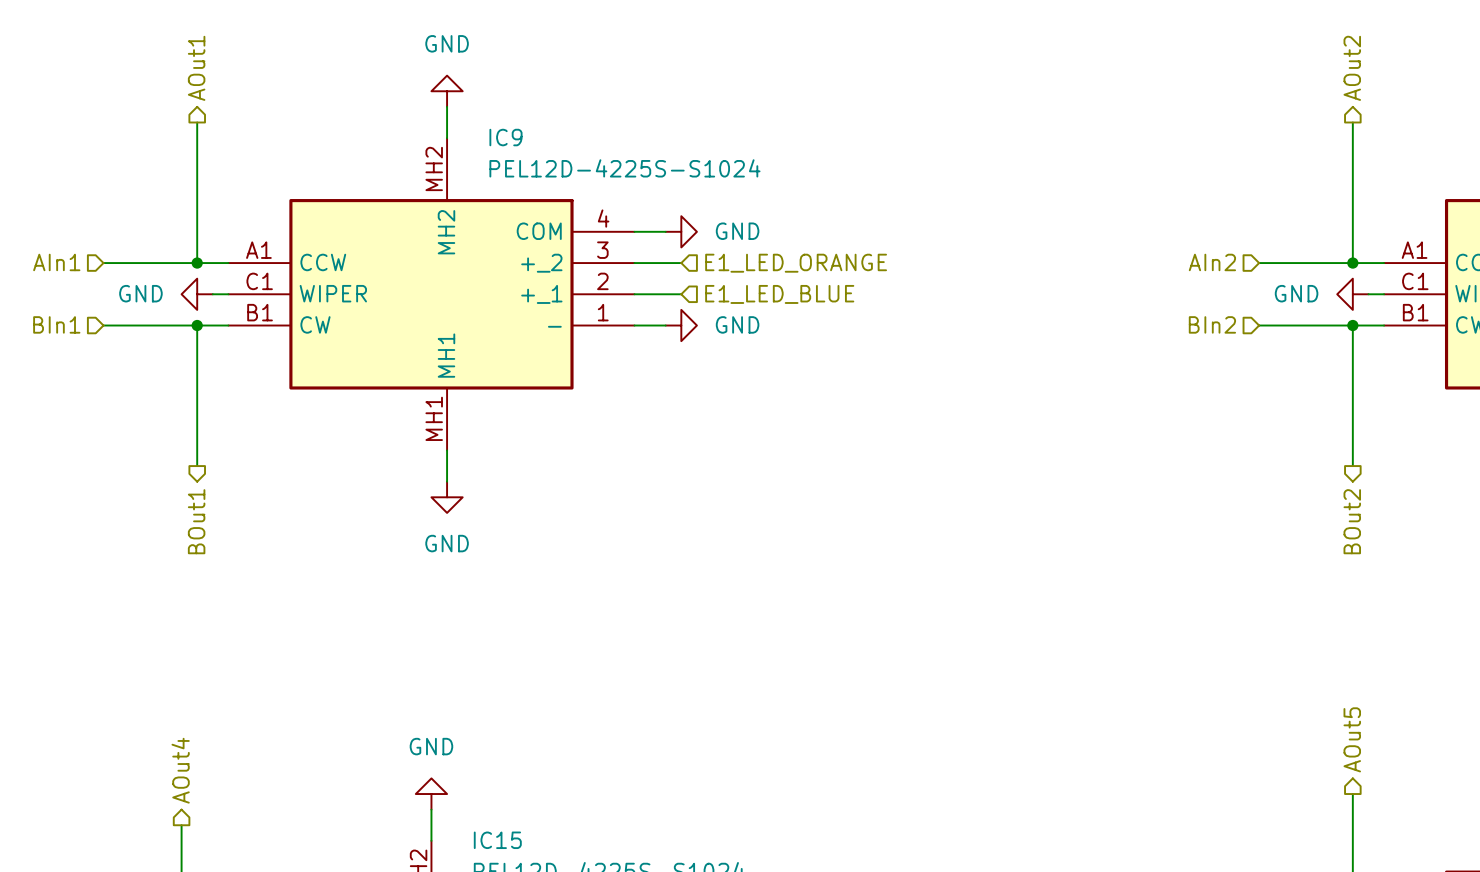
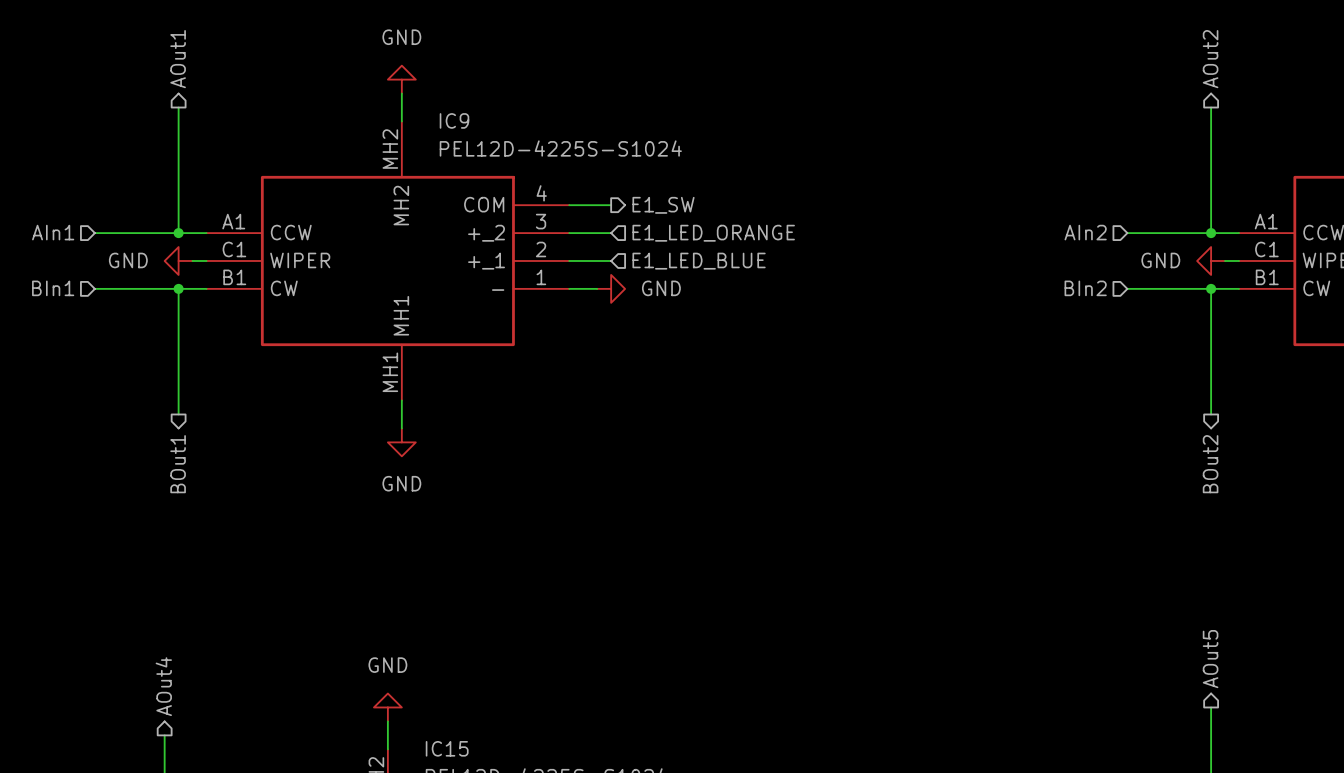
power symbol: GND (681, 231) -> none
hierarchical label: none -> E1_SW (663, 205)

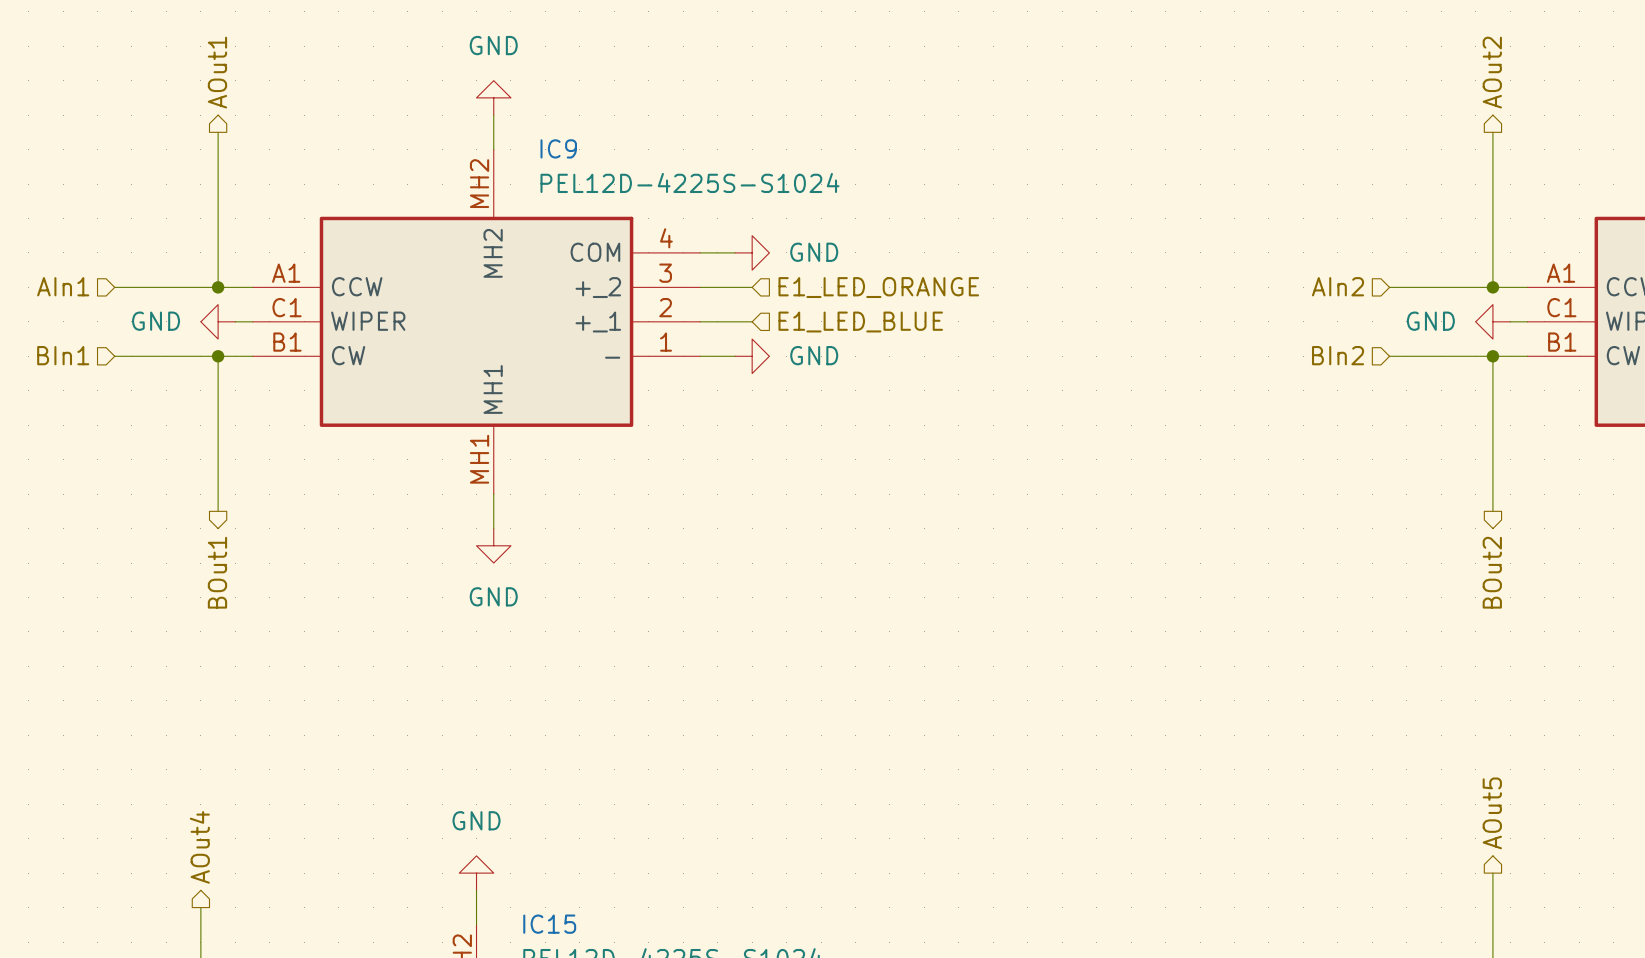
power symbol: none -> GND (752, 252)
hierarchical label: E1_SW (663, 205) -> none

